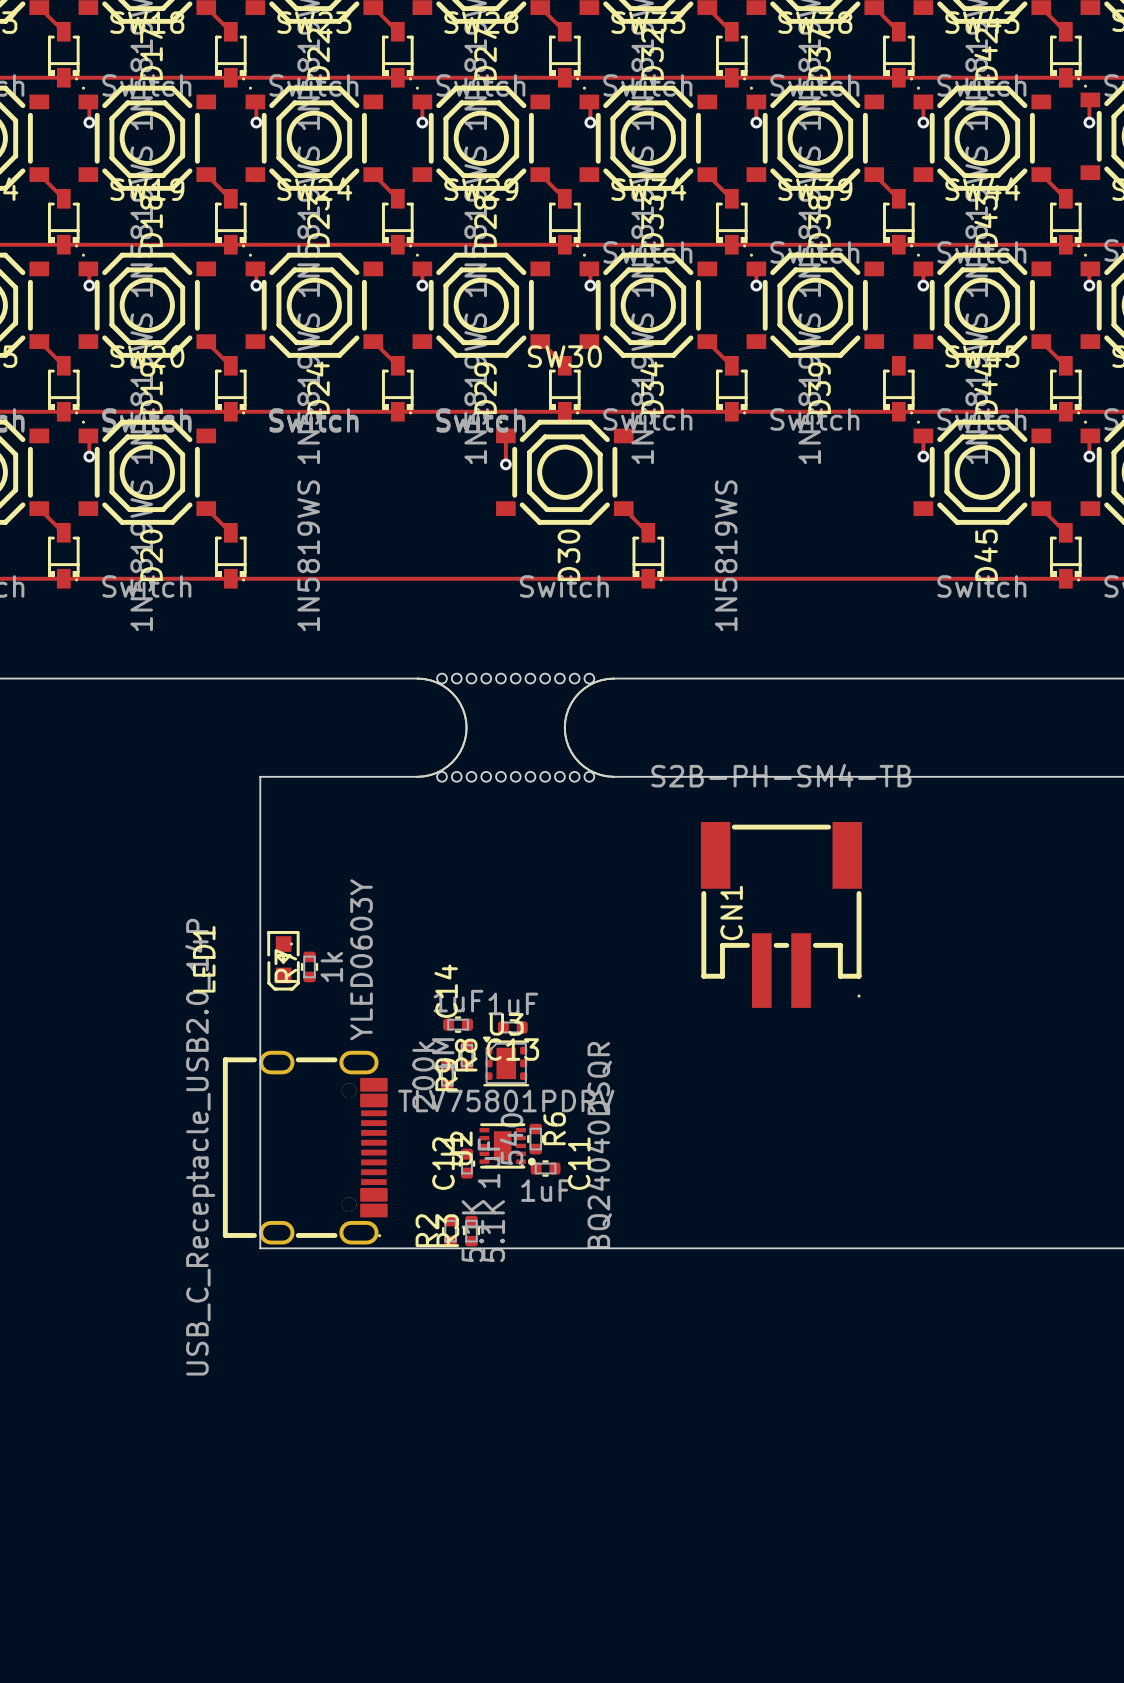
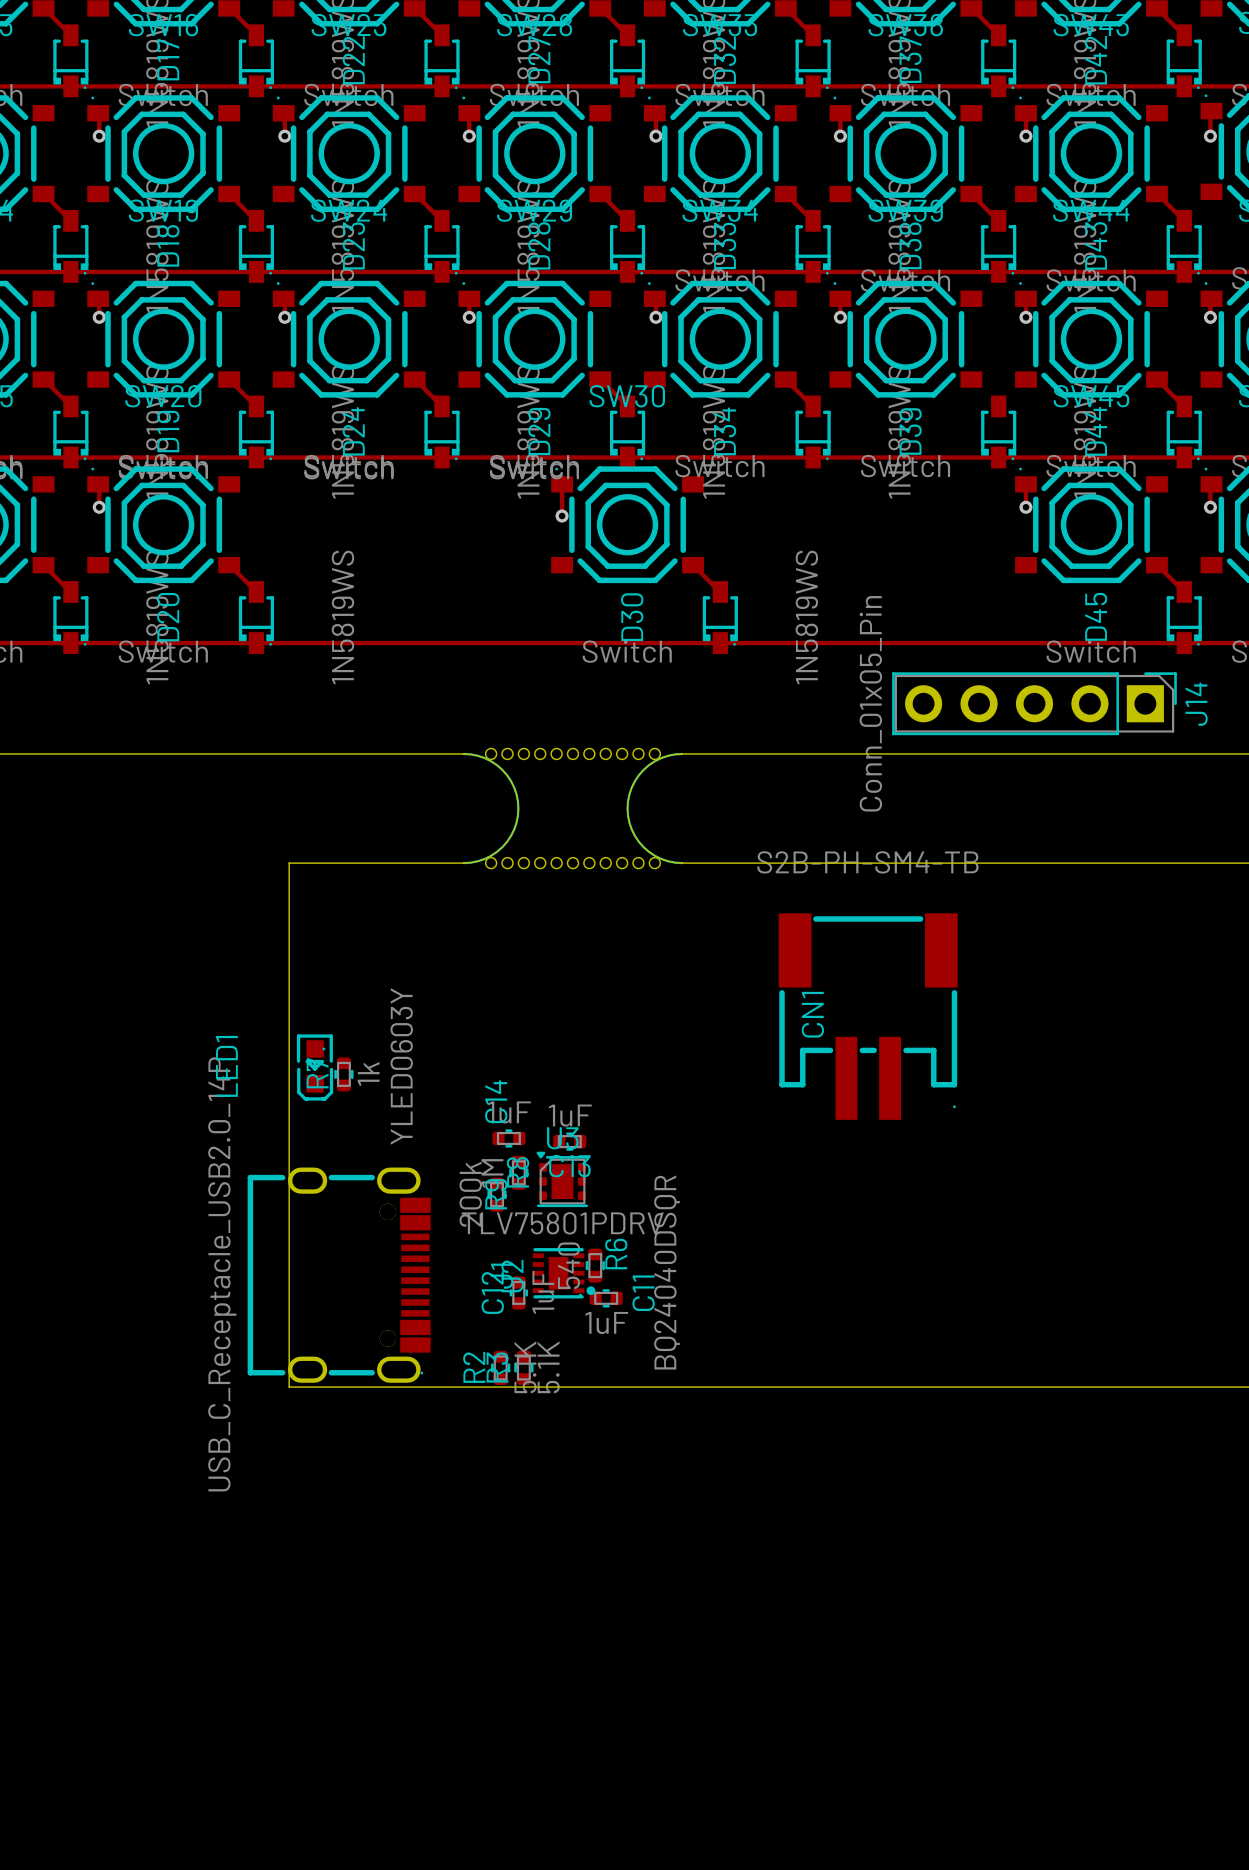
J14: none -> Conn_01x05_Pin (1034, 703)

